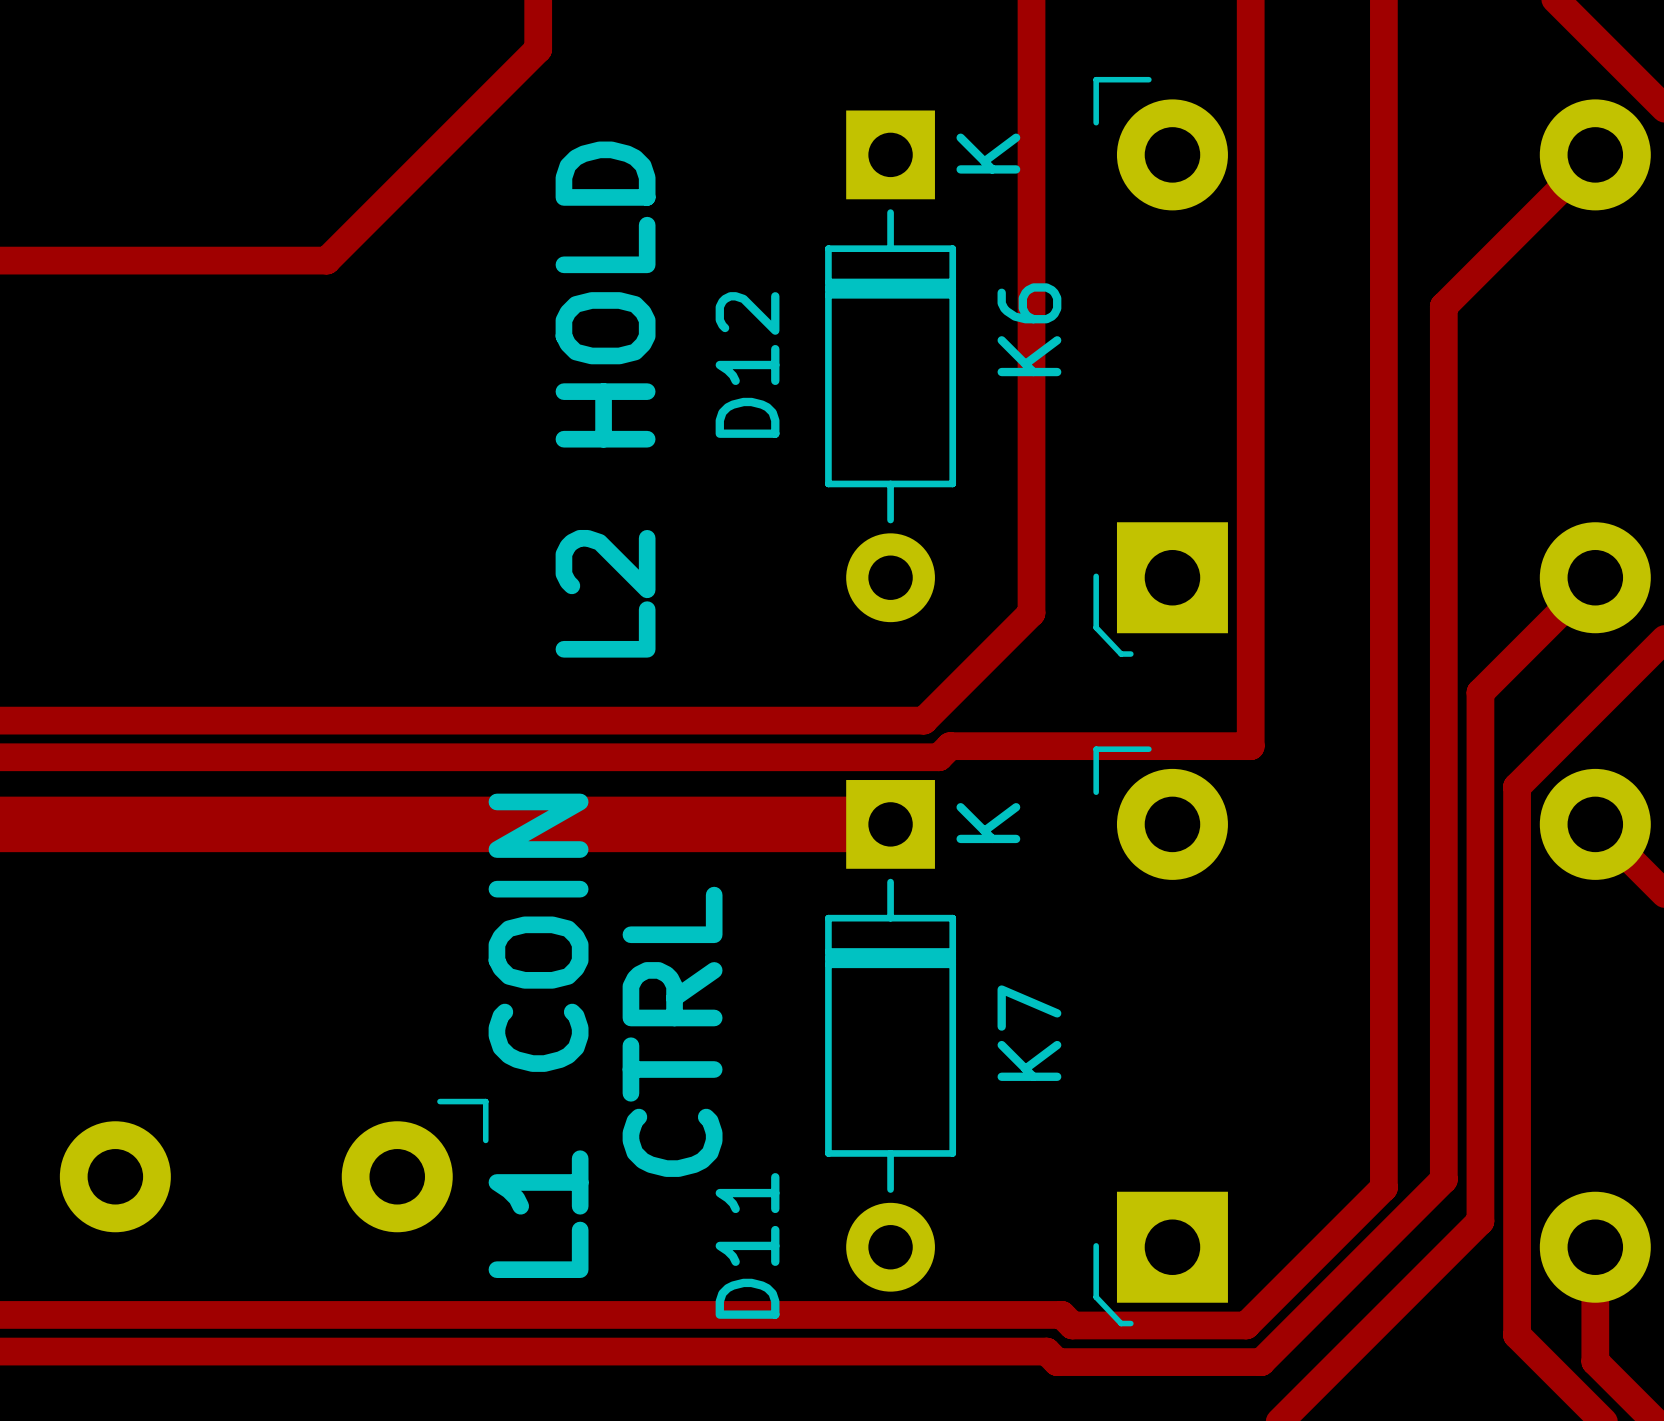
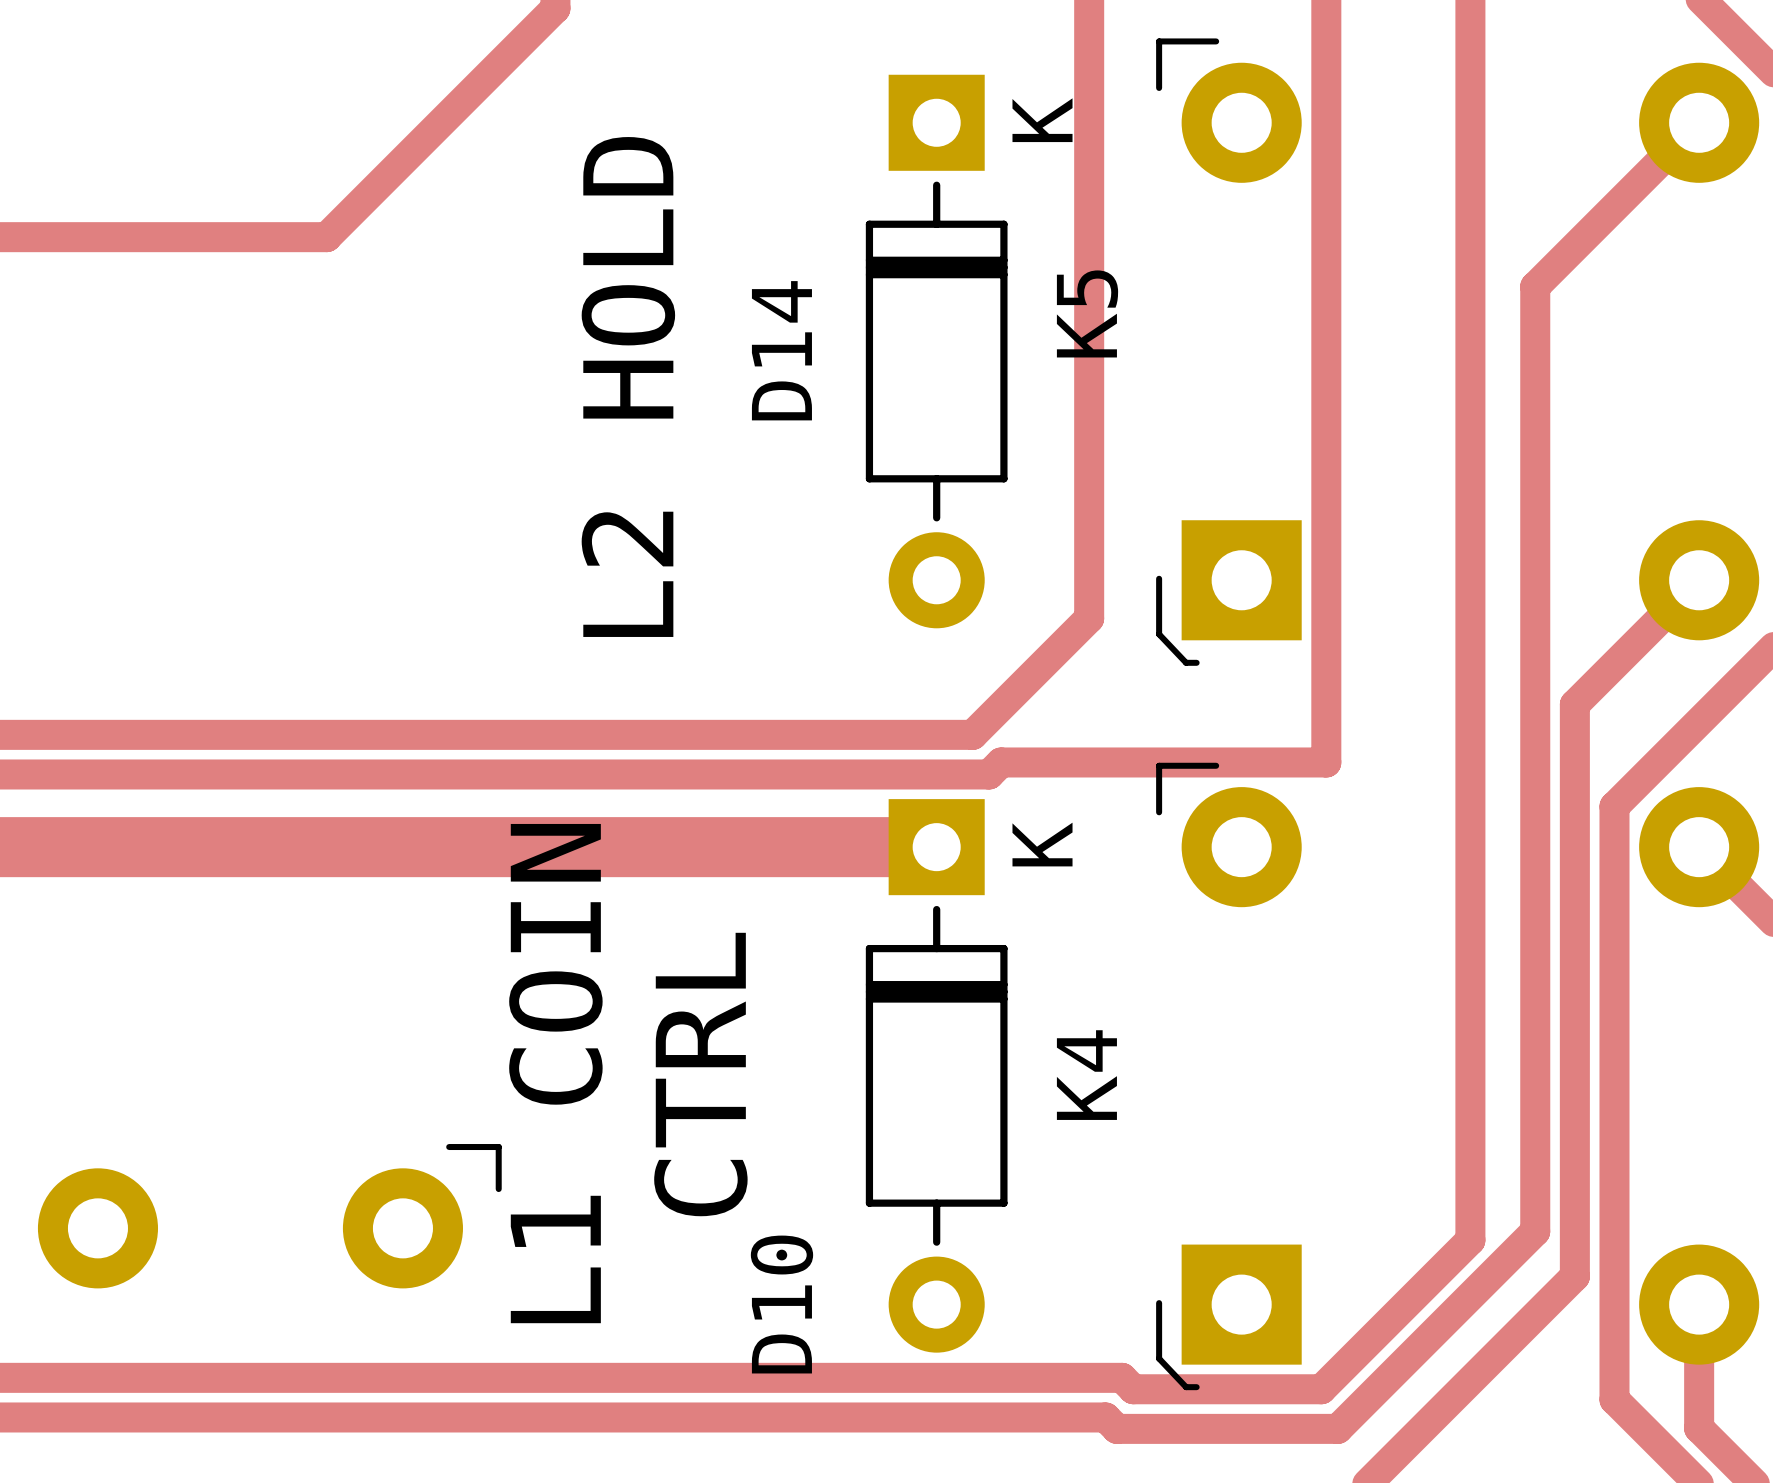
K6 name: K6 (1029, 329) -> K5 (1087, 313)
D12 name: D12 (747, 364) -> D14 (781, 350)
K7 name: K7 (1029, 1033) -> K4 (1086, 1075)
D11 name: D11 (747, 1245) -> D10 (781, 1304)

